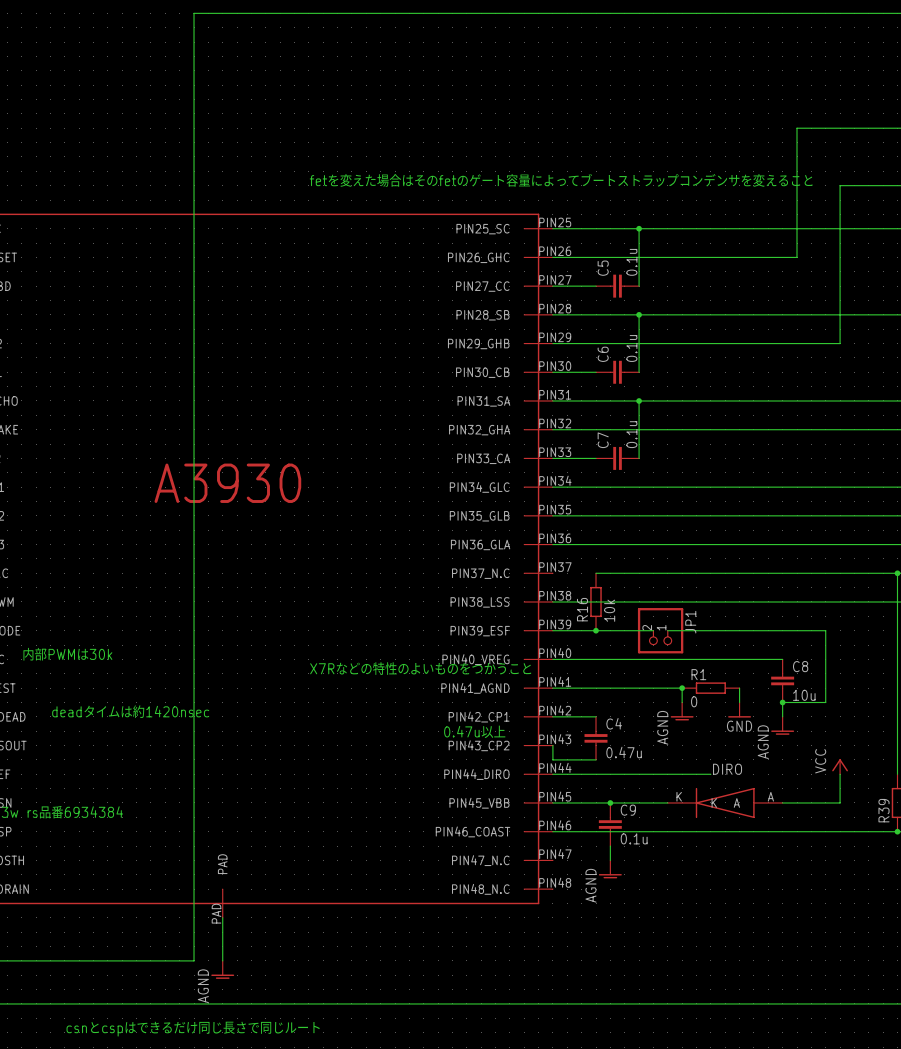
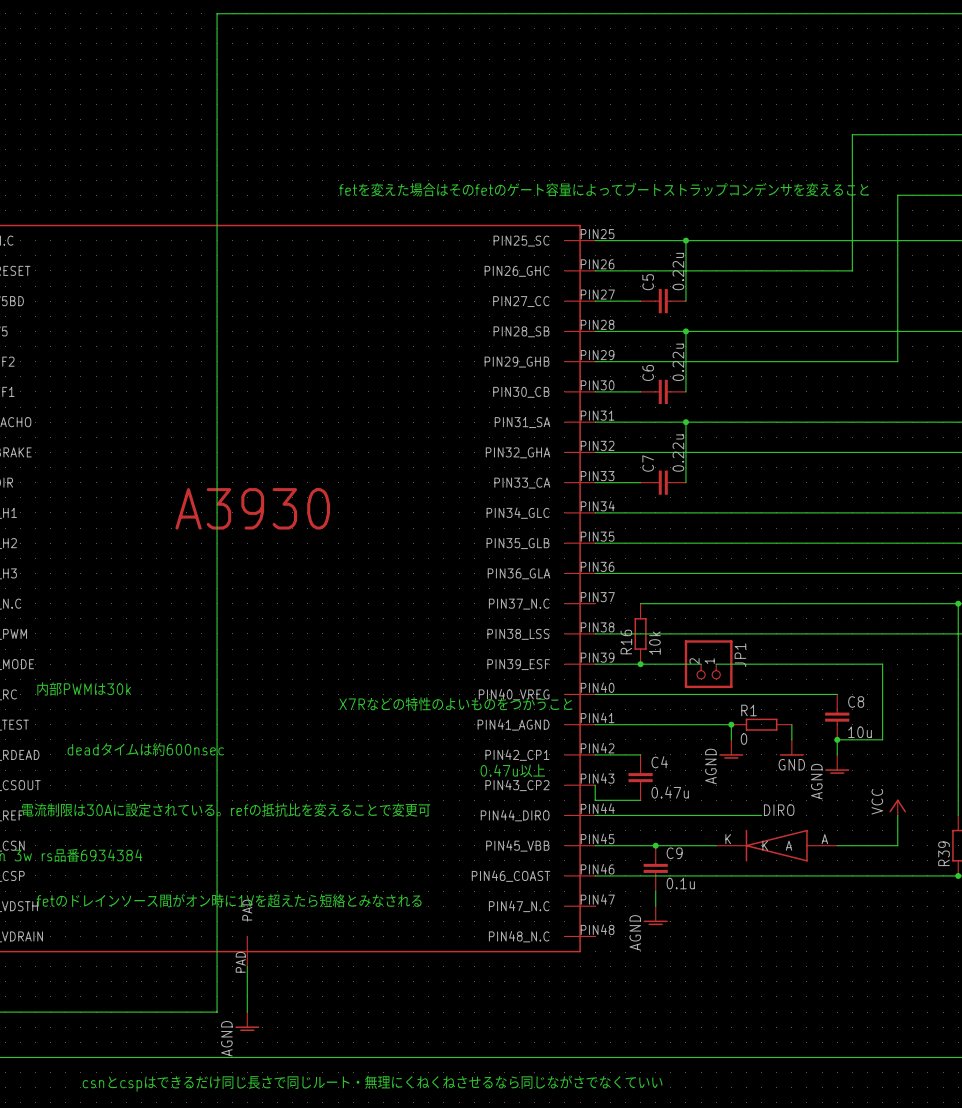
C5 value: 0.1u (631, 262) -> 0.22u (678, 271)
C6 value: 0.1u (631, 348) -> 0.22u (678, 362)
C7 value: 0.1u (631, 434) -> 0.22u (678, 453)
text: deadタイムは約1420nsec (130, 711) -> deadタイムは約600nsec (145, 749)
text: none -> 電流制限は30Aに設定されている。refの抵抗比を変えることで変更可 (226, 809)
text: none -> fetのドレインソース間がオン時に1Vを超えたら短絡とみなされる (229, 900)
text: csnとcspはできるだけ同じ長さで同じルート (193, 1028) -> csnとcspはできるだけ同じ長さで同じルート・無理にくねくねさせるなら同じながさでなくていい (372, 1083)

